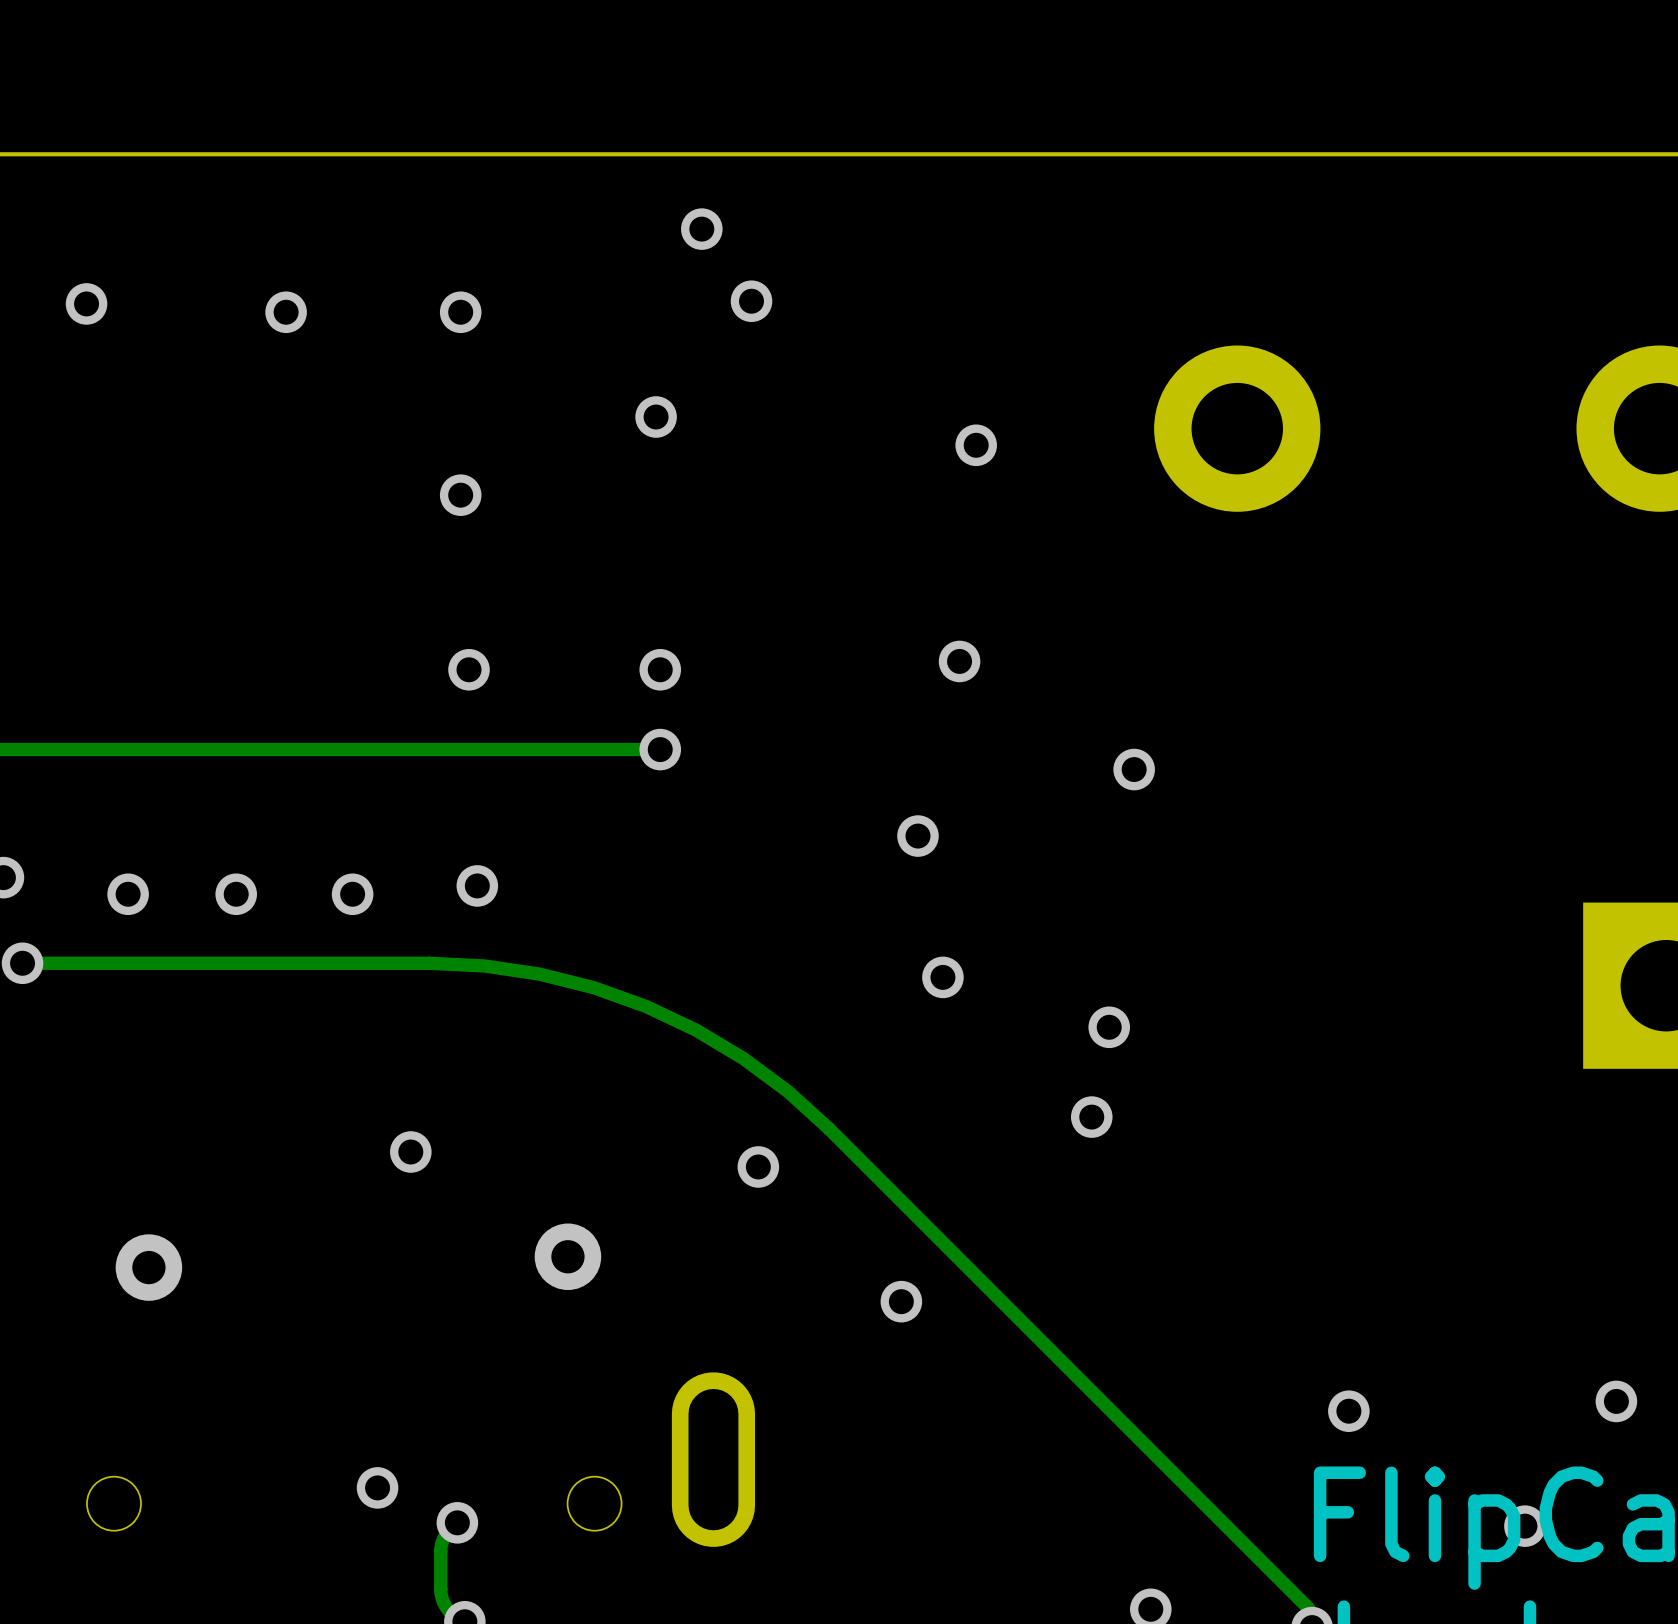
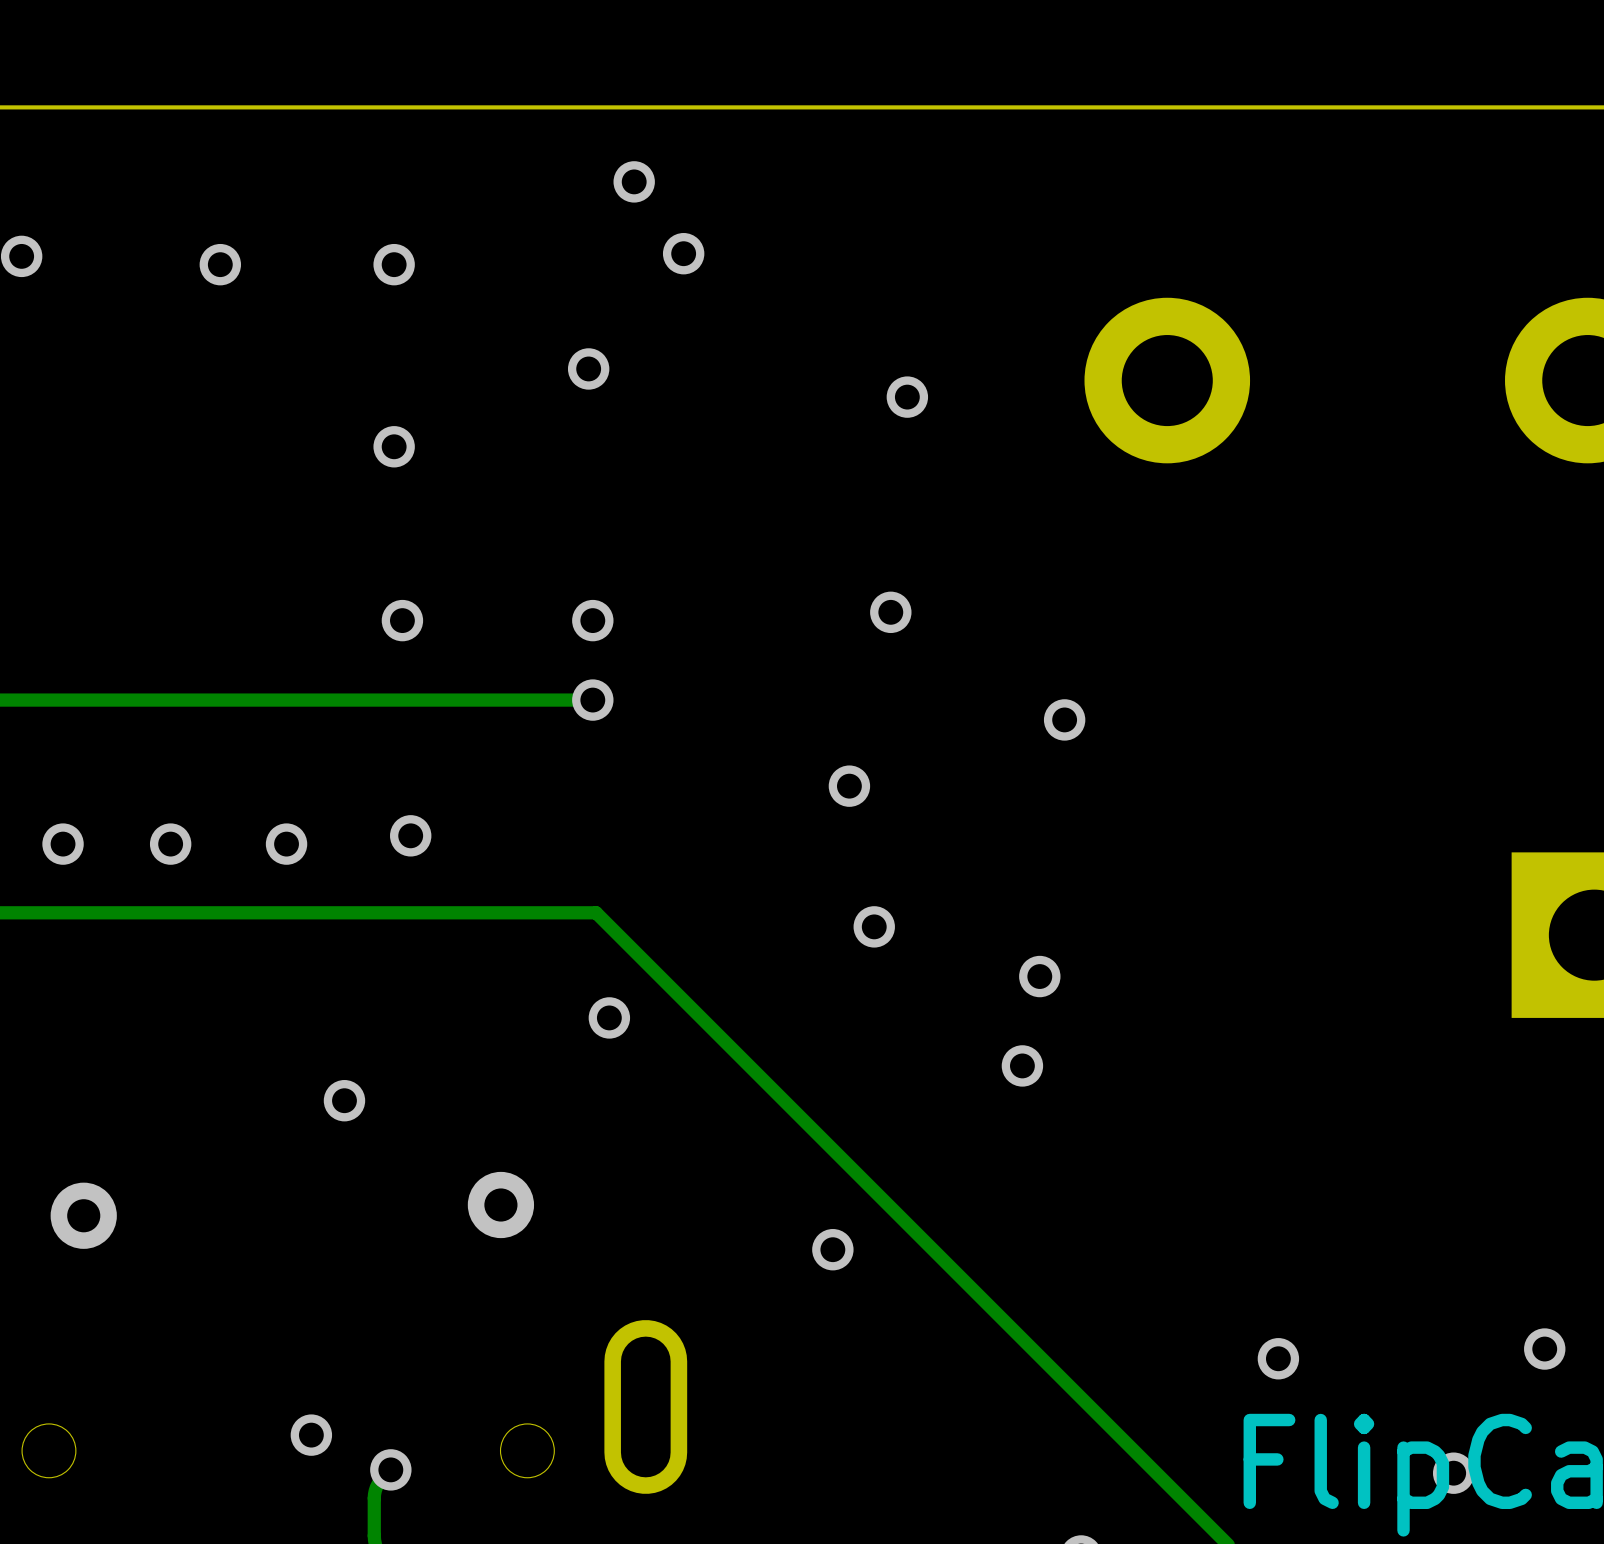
track: (429, 963) (484, 965) (539, 974) (593, 987) (645, 1006) (695, 1030) (743, 1058) (788, 1091) (829, 1128) -> (362, 912) (596, 912) (761, 1077)
via position: (758, 1166) -> (609, 1017)

